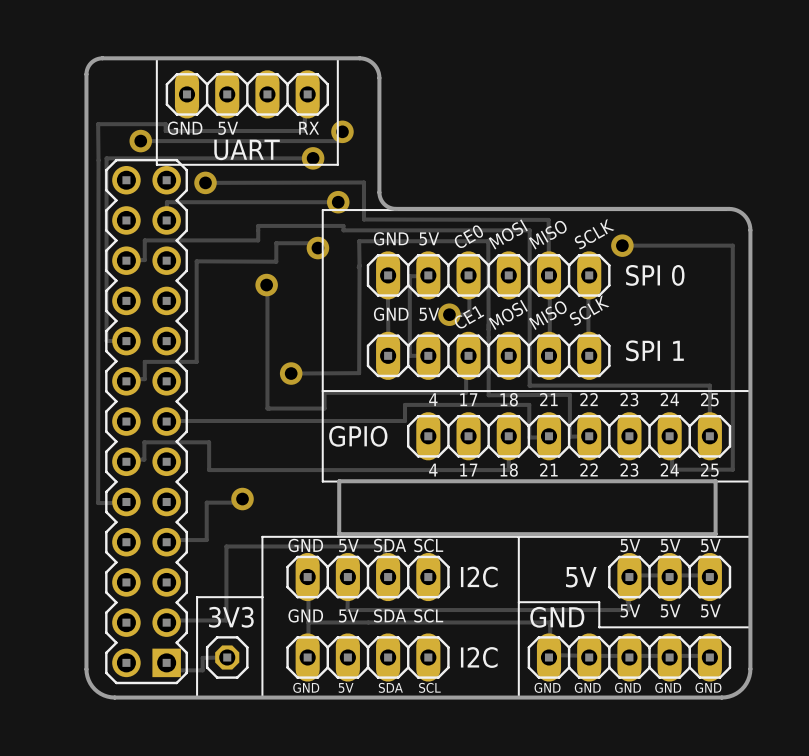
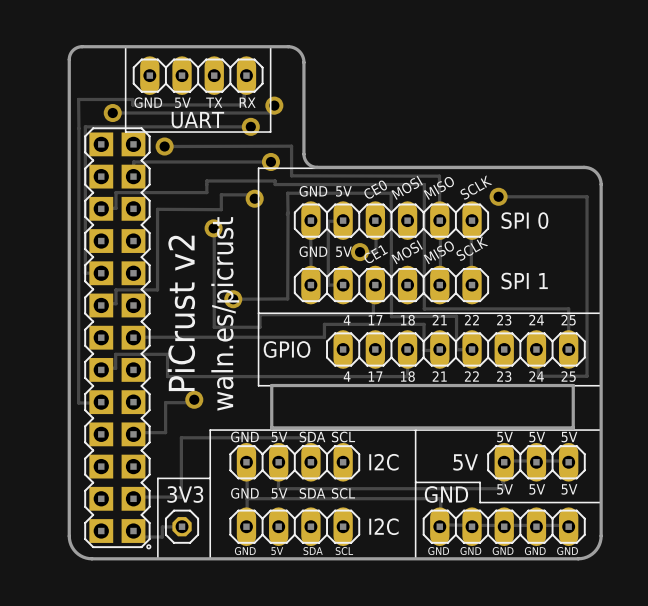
text: none -> TX (214, 102)
part footprint: [105, 158, 188, 685] -> [84, 127, 152, 550]
text: none -> PiCrust v2 (181, 313)
text: none -> waln.es/picrust (225, 313)

